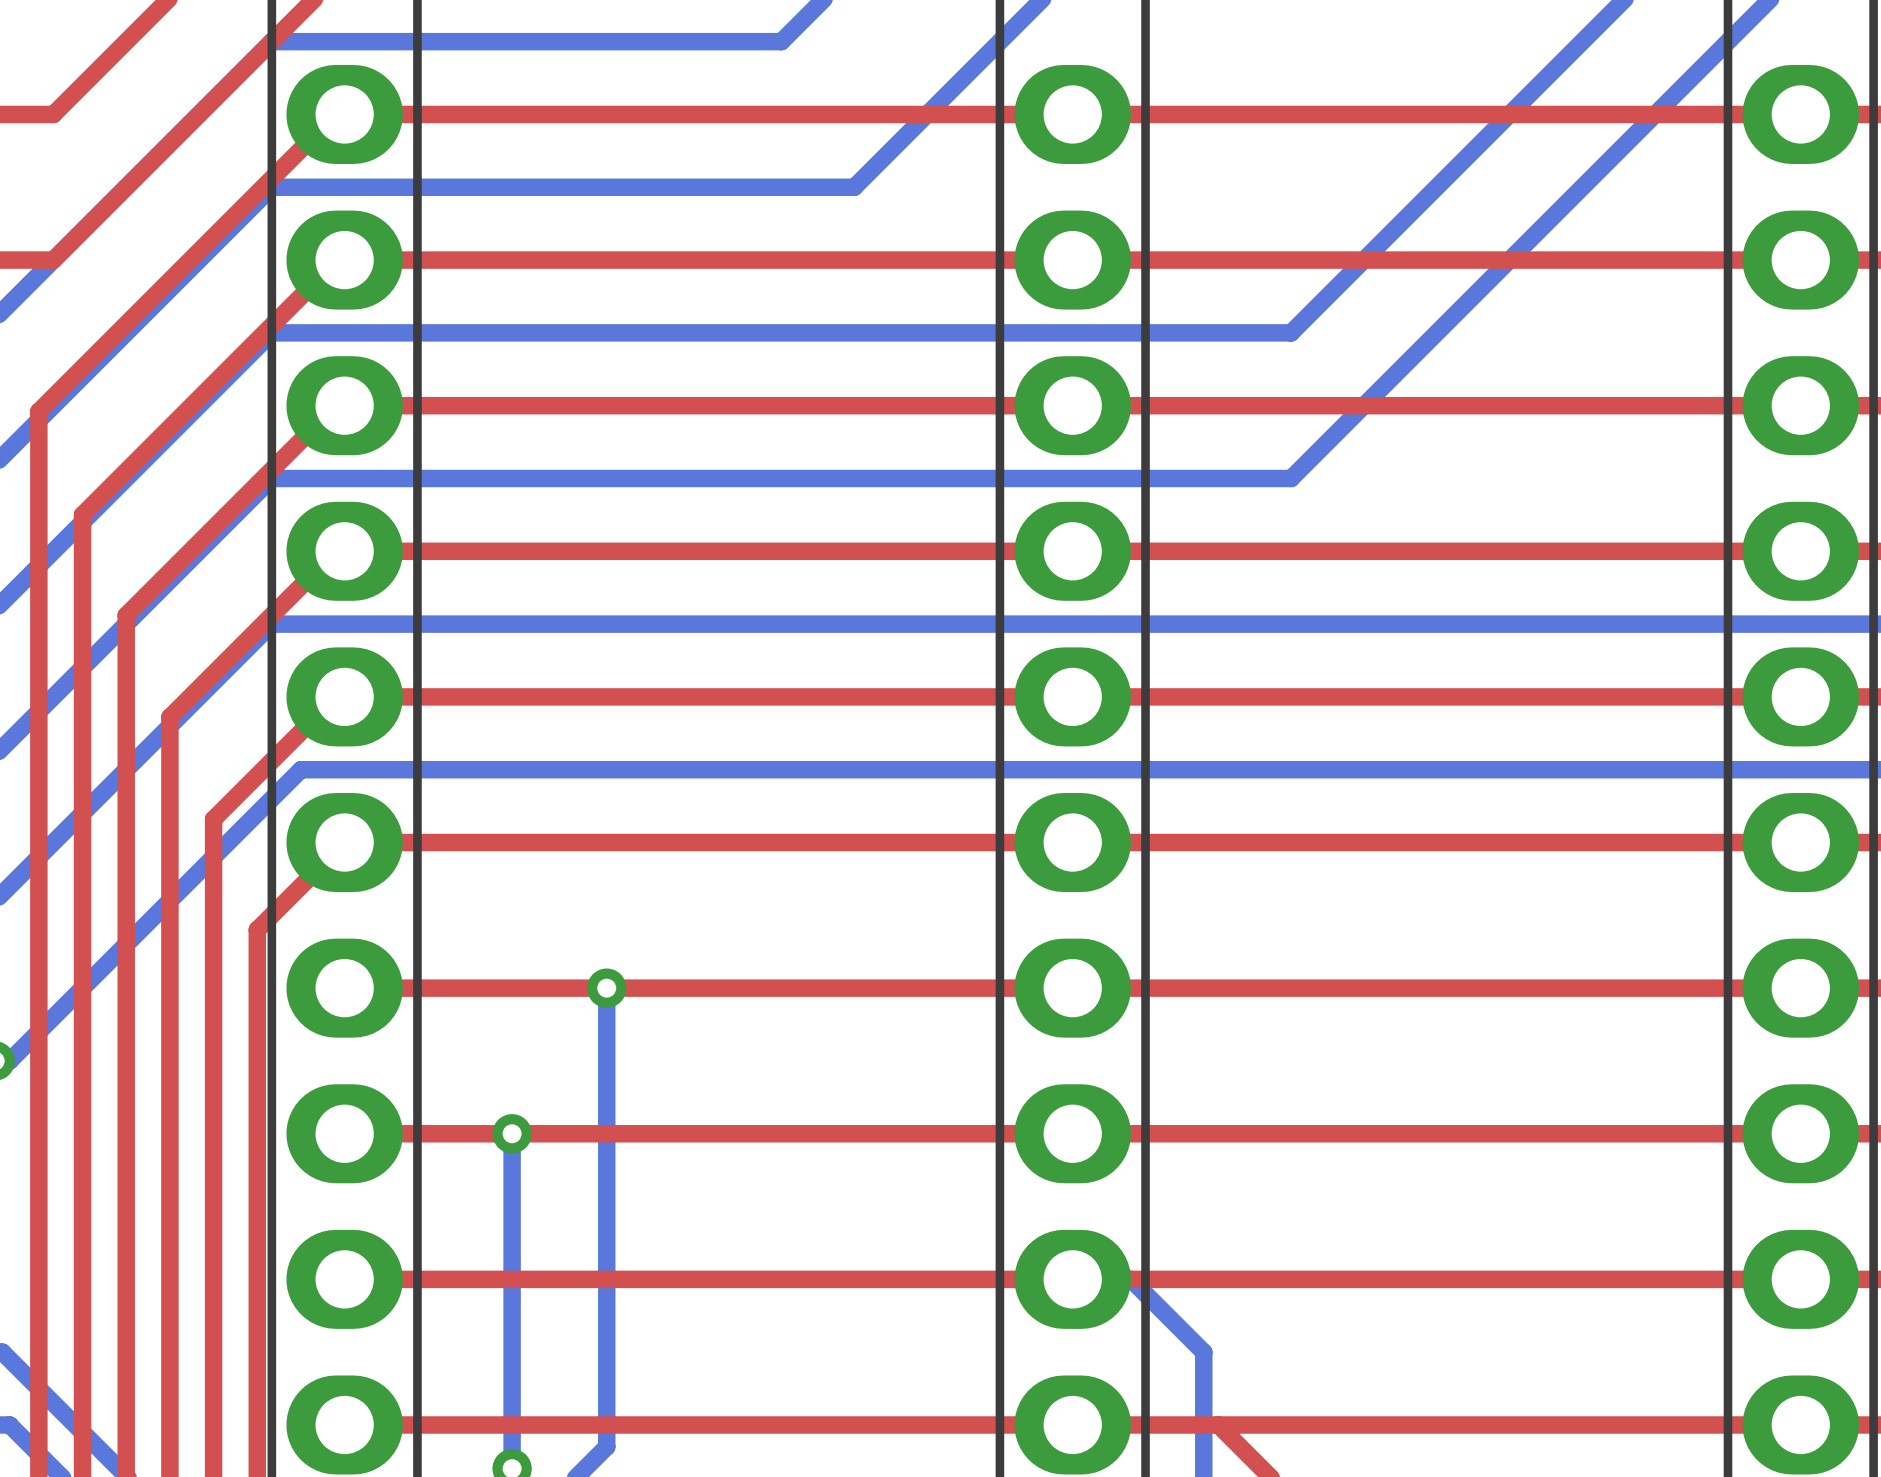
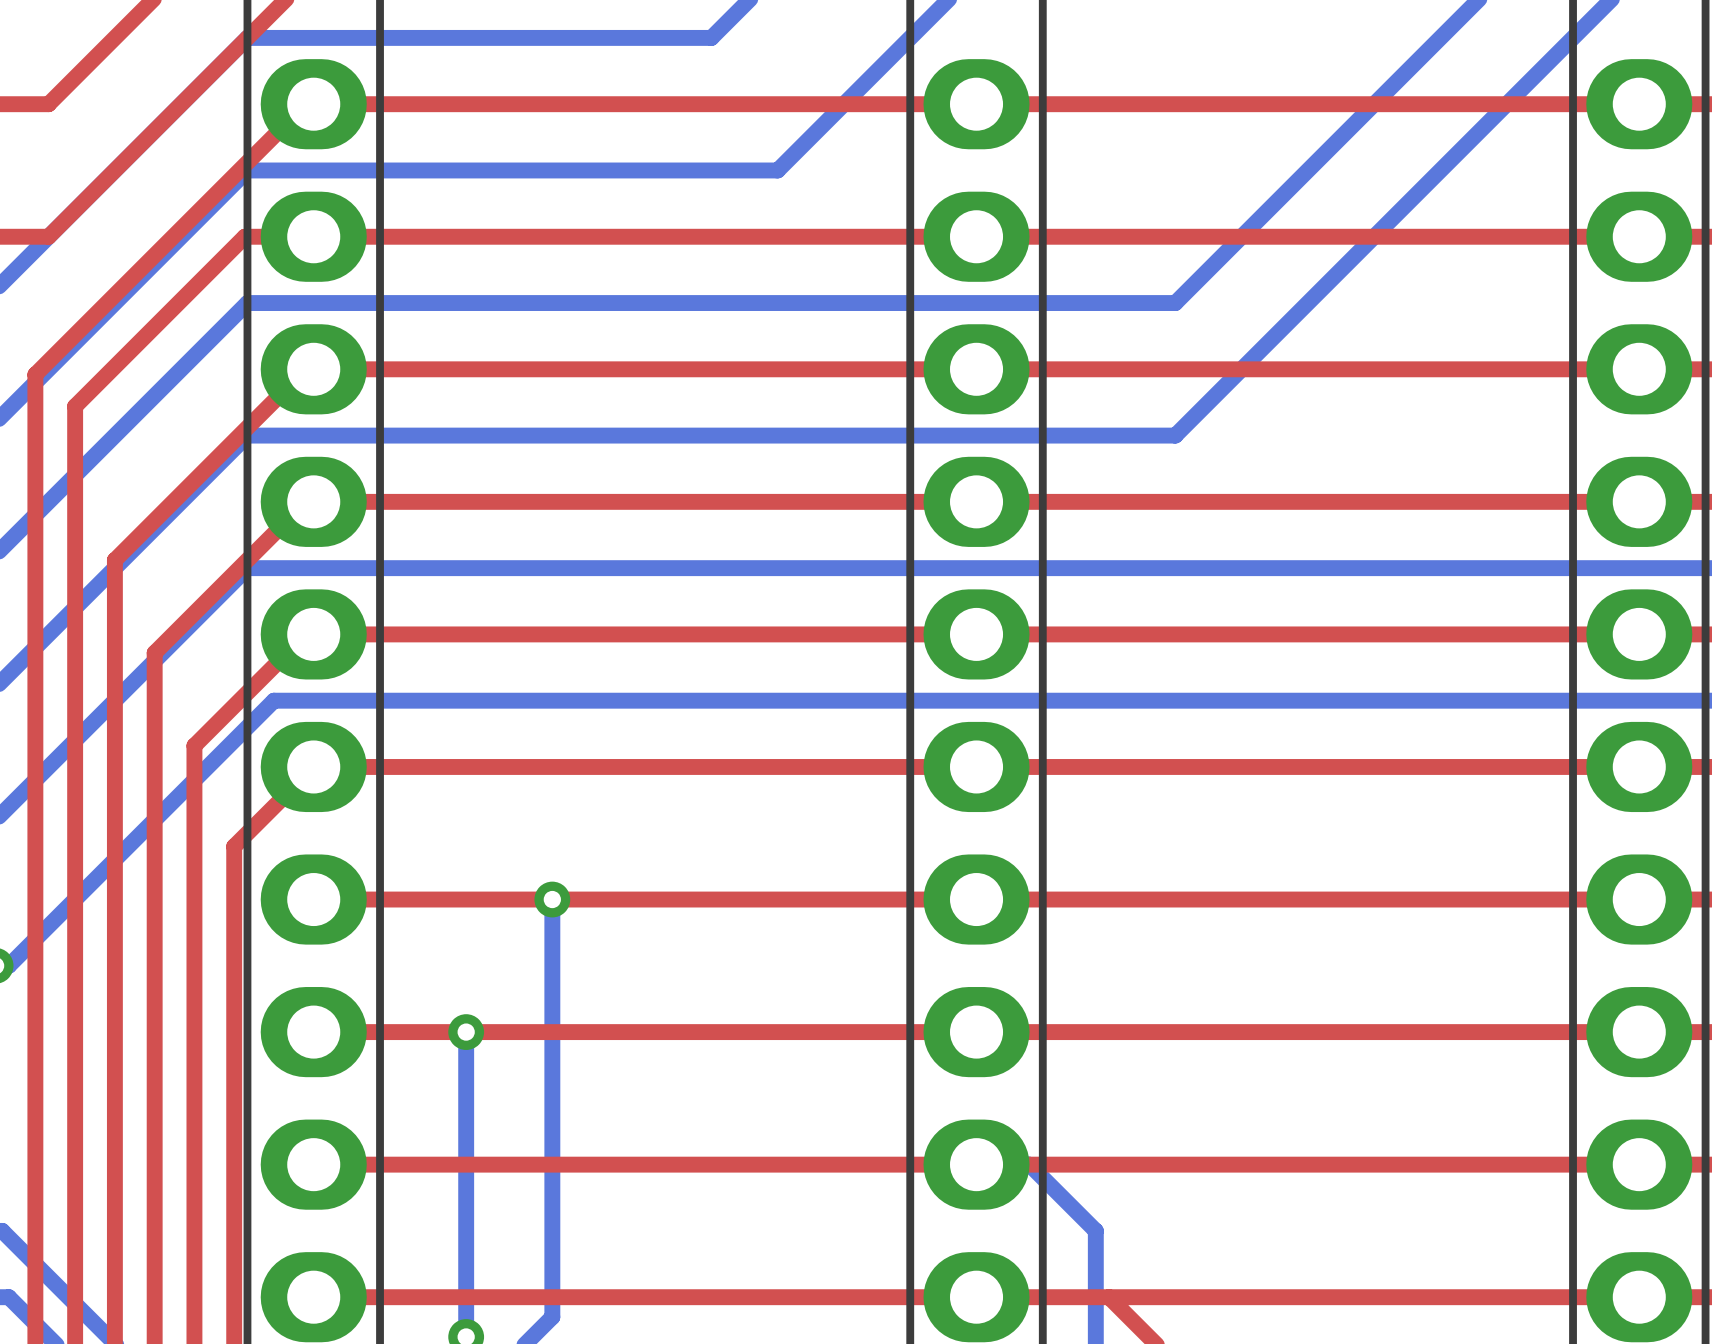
top track: (337, 260) (82, 514) -> (305, 236) (244, 236) (75, 406) (75, 468)

